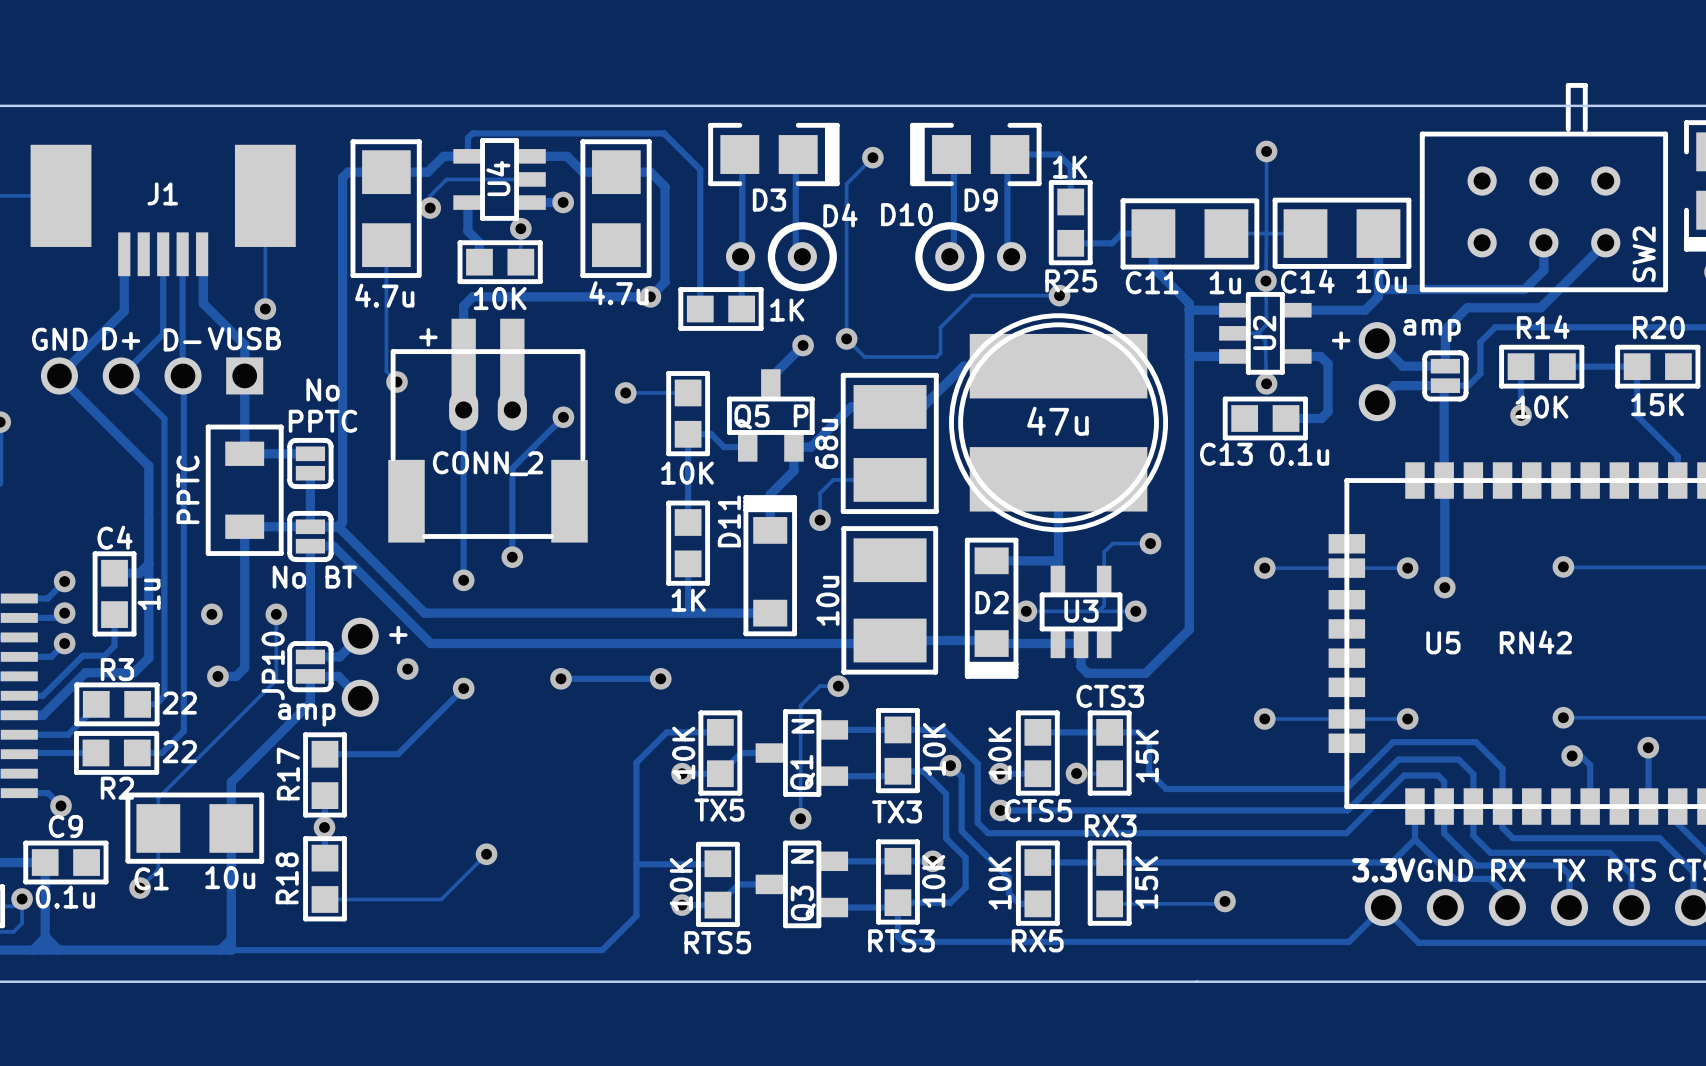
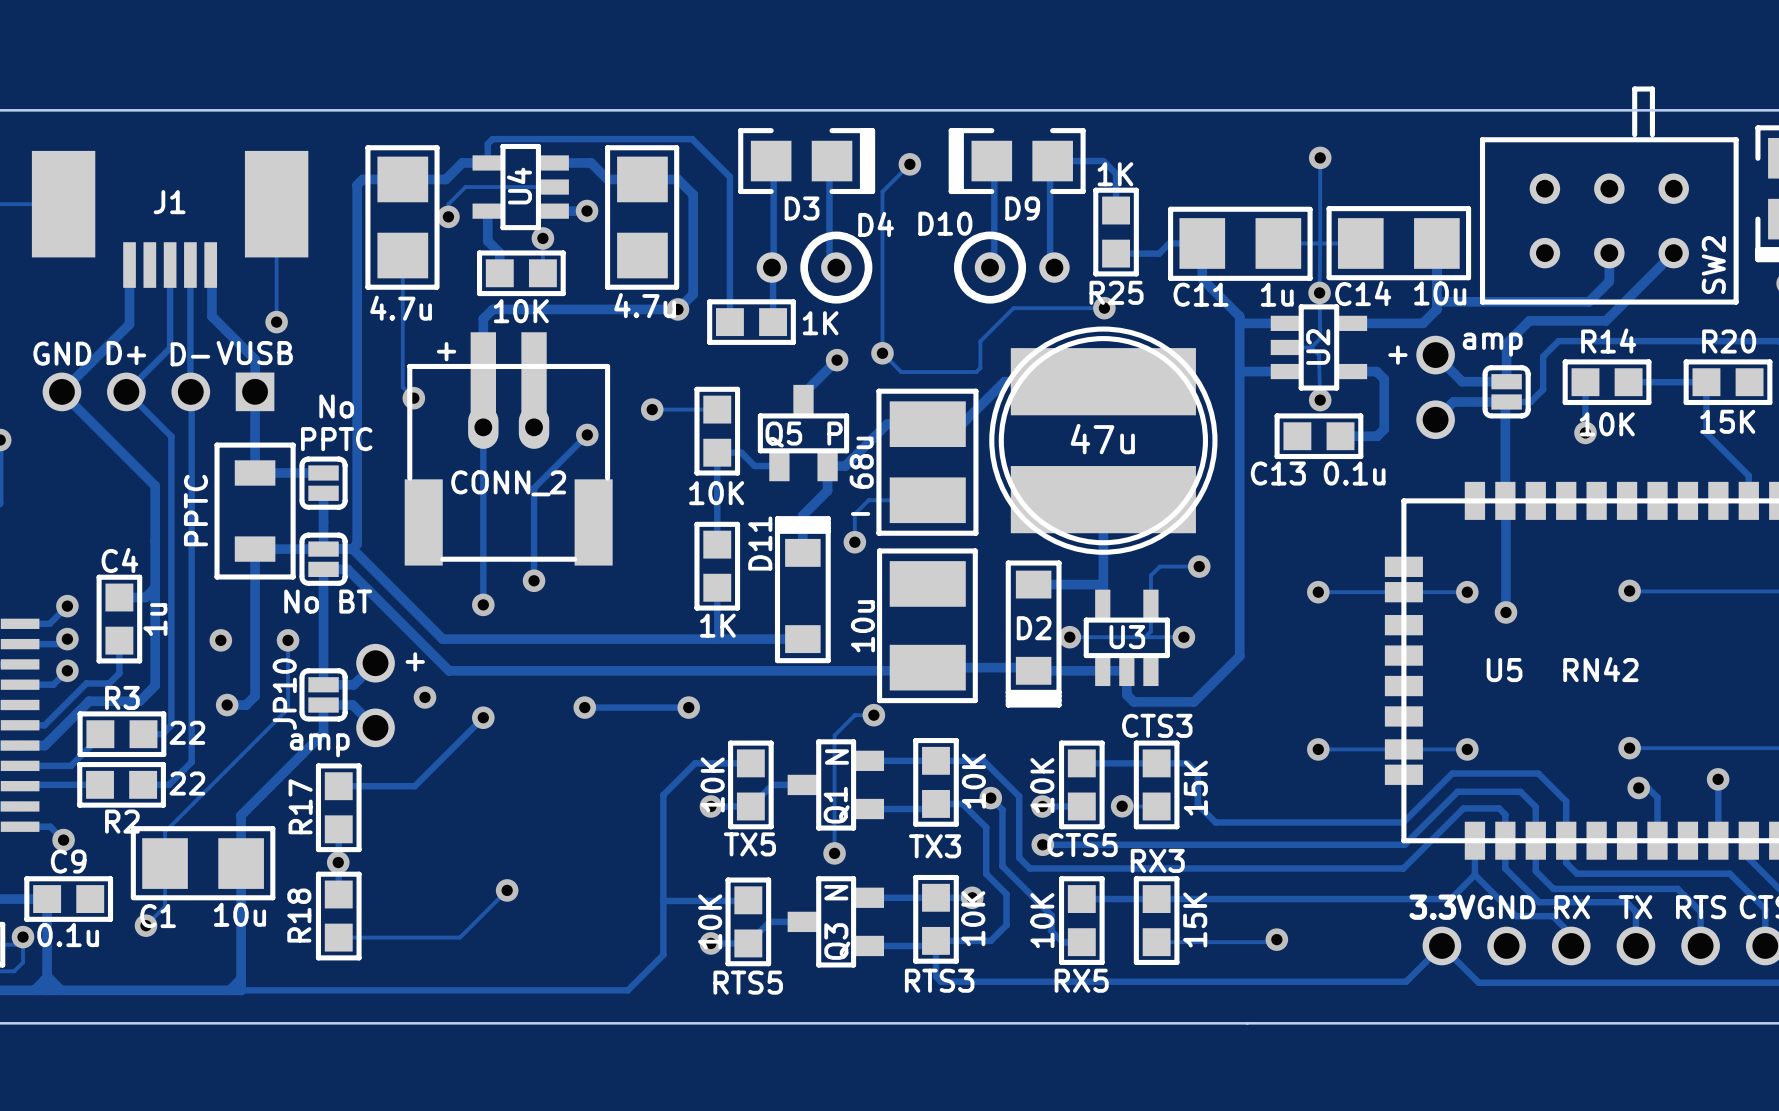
text: none -> - (860, 513)

